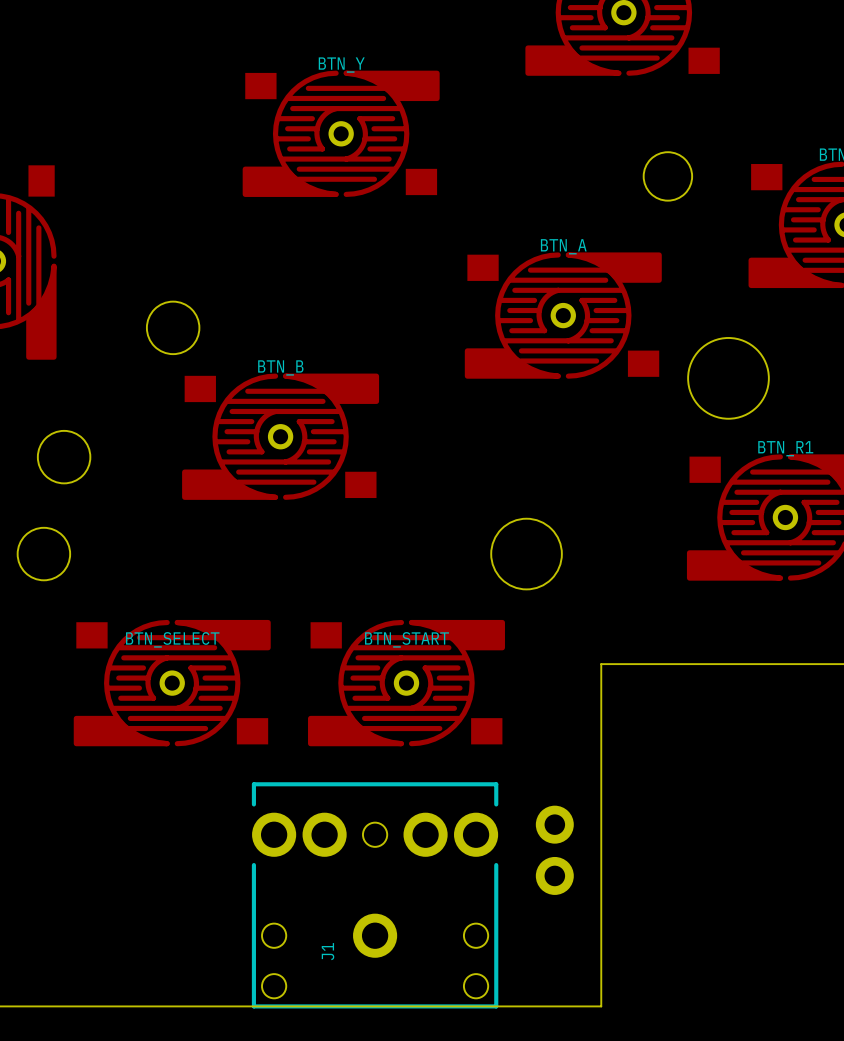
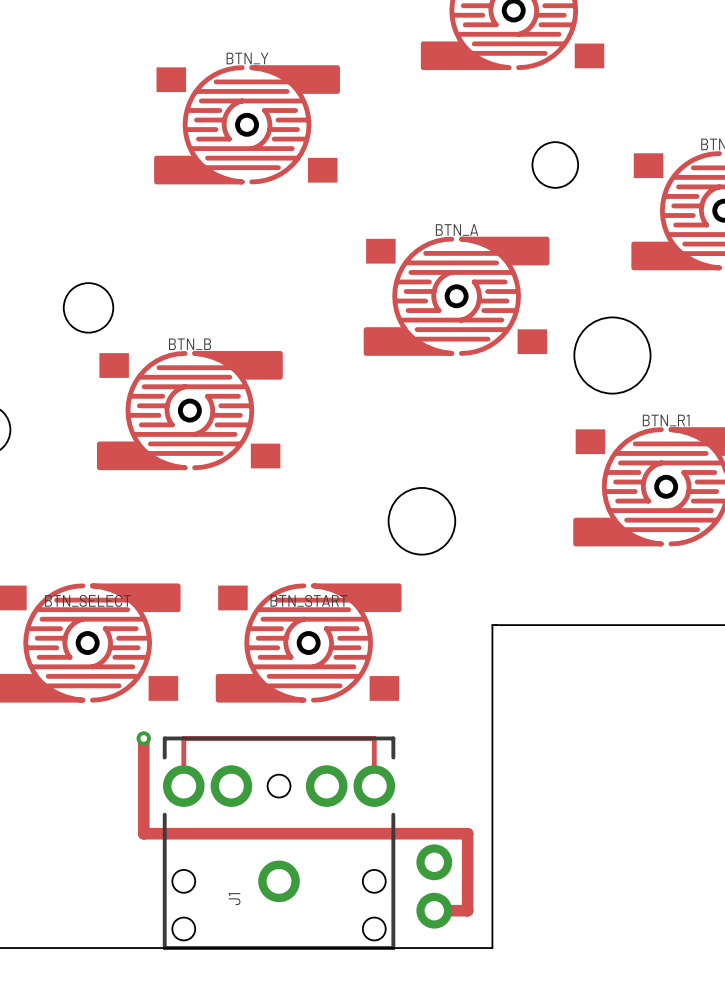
track: none -> (143, 738) (143, 833) (467, 833) (467, 910) (434, 910)
via: none -> (143, 738)
track: none -> (183, 786) (183, 738) (374, 738) (374, 786)
part position: (554, 850) -> (434, 886)

